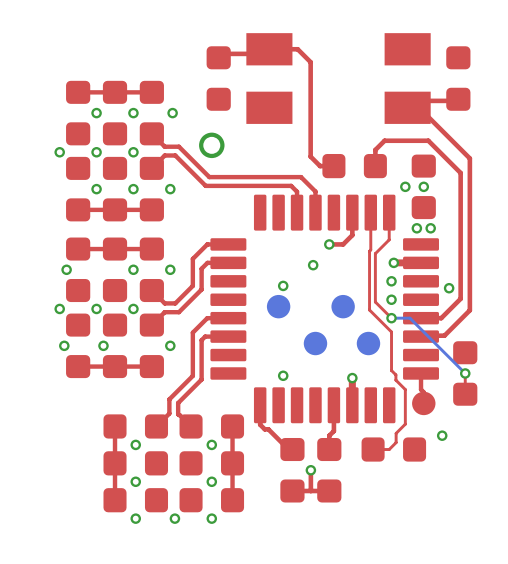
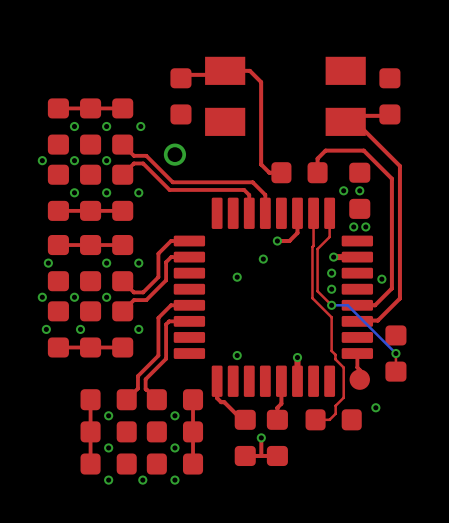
part: (278, 306) -> none
part: (343, 306) -> none
part: (315, 343) -> none
part: (368, 343) -> none

